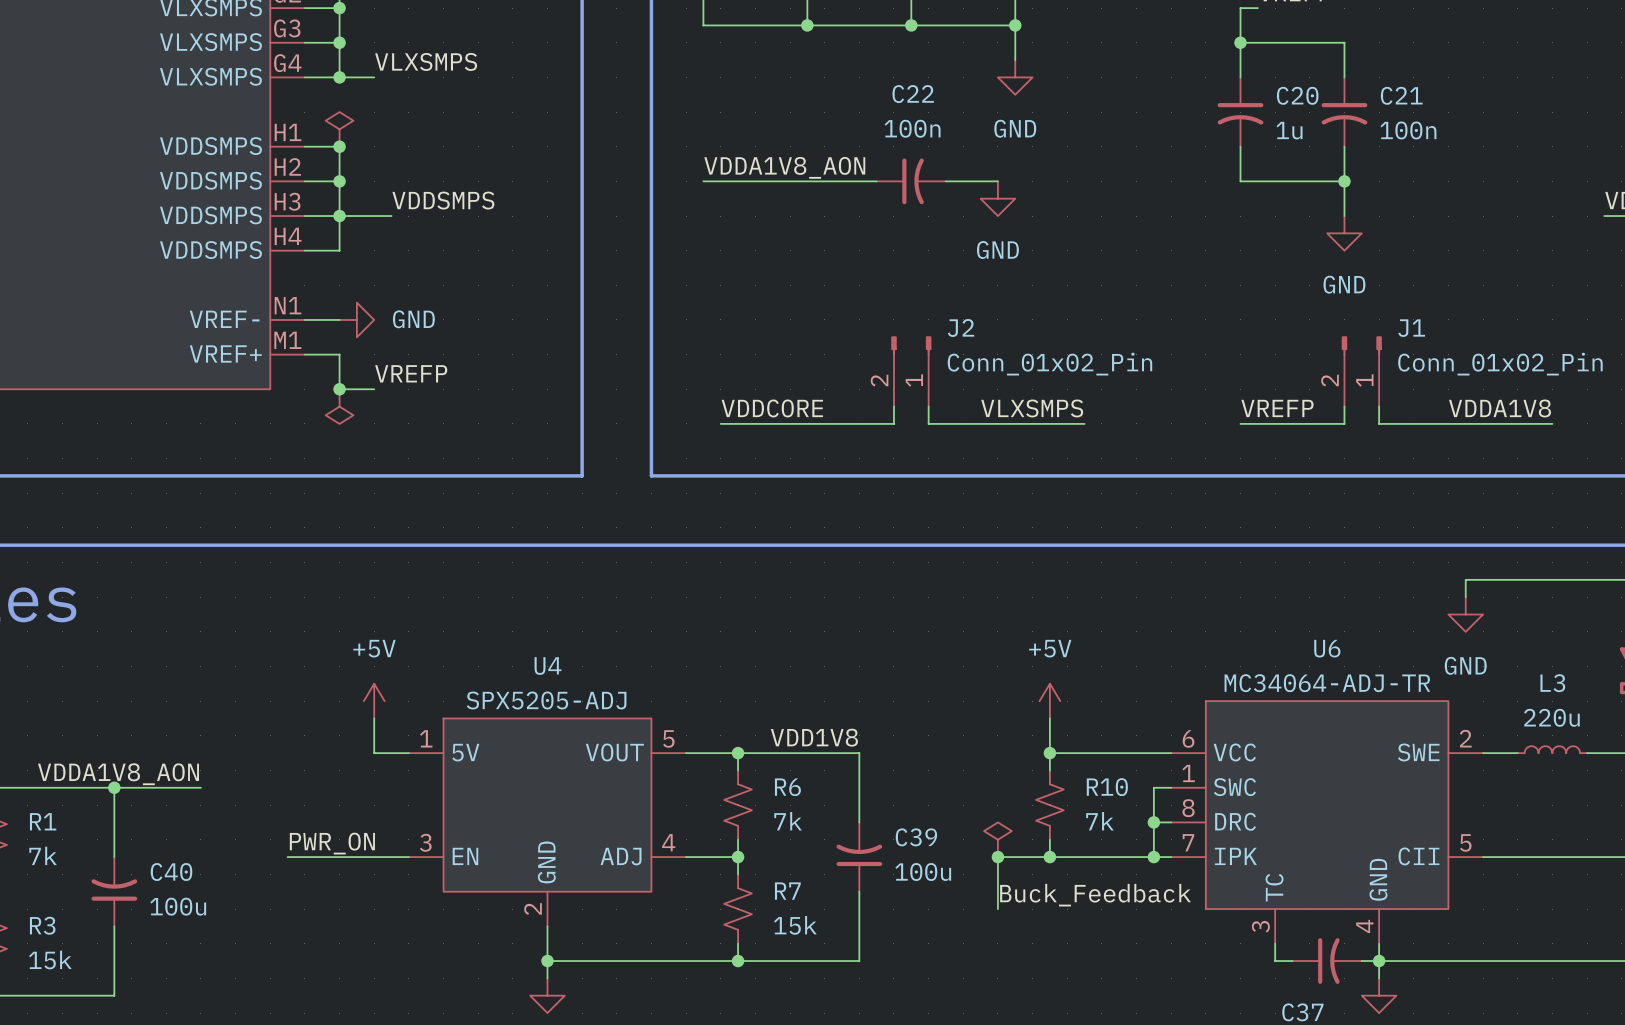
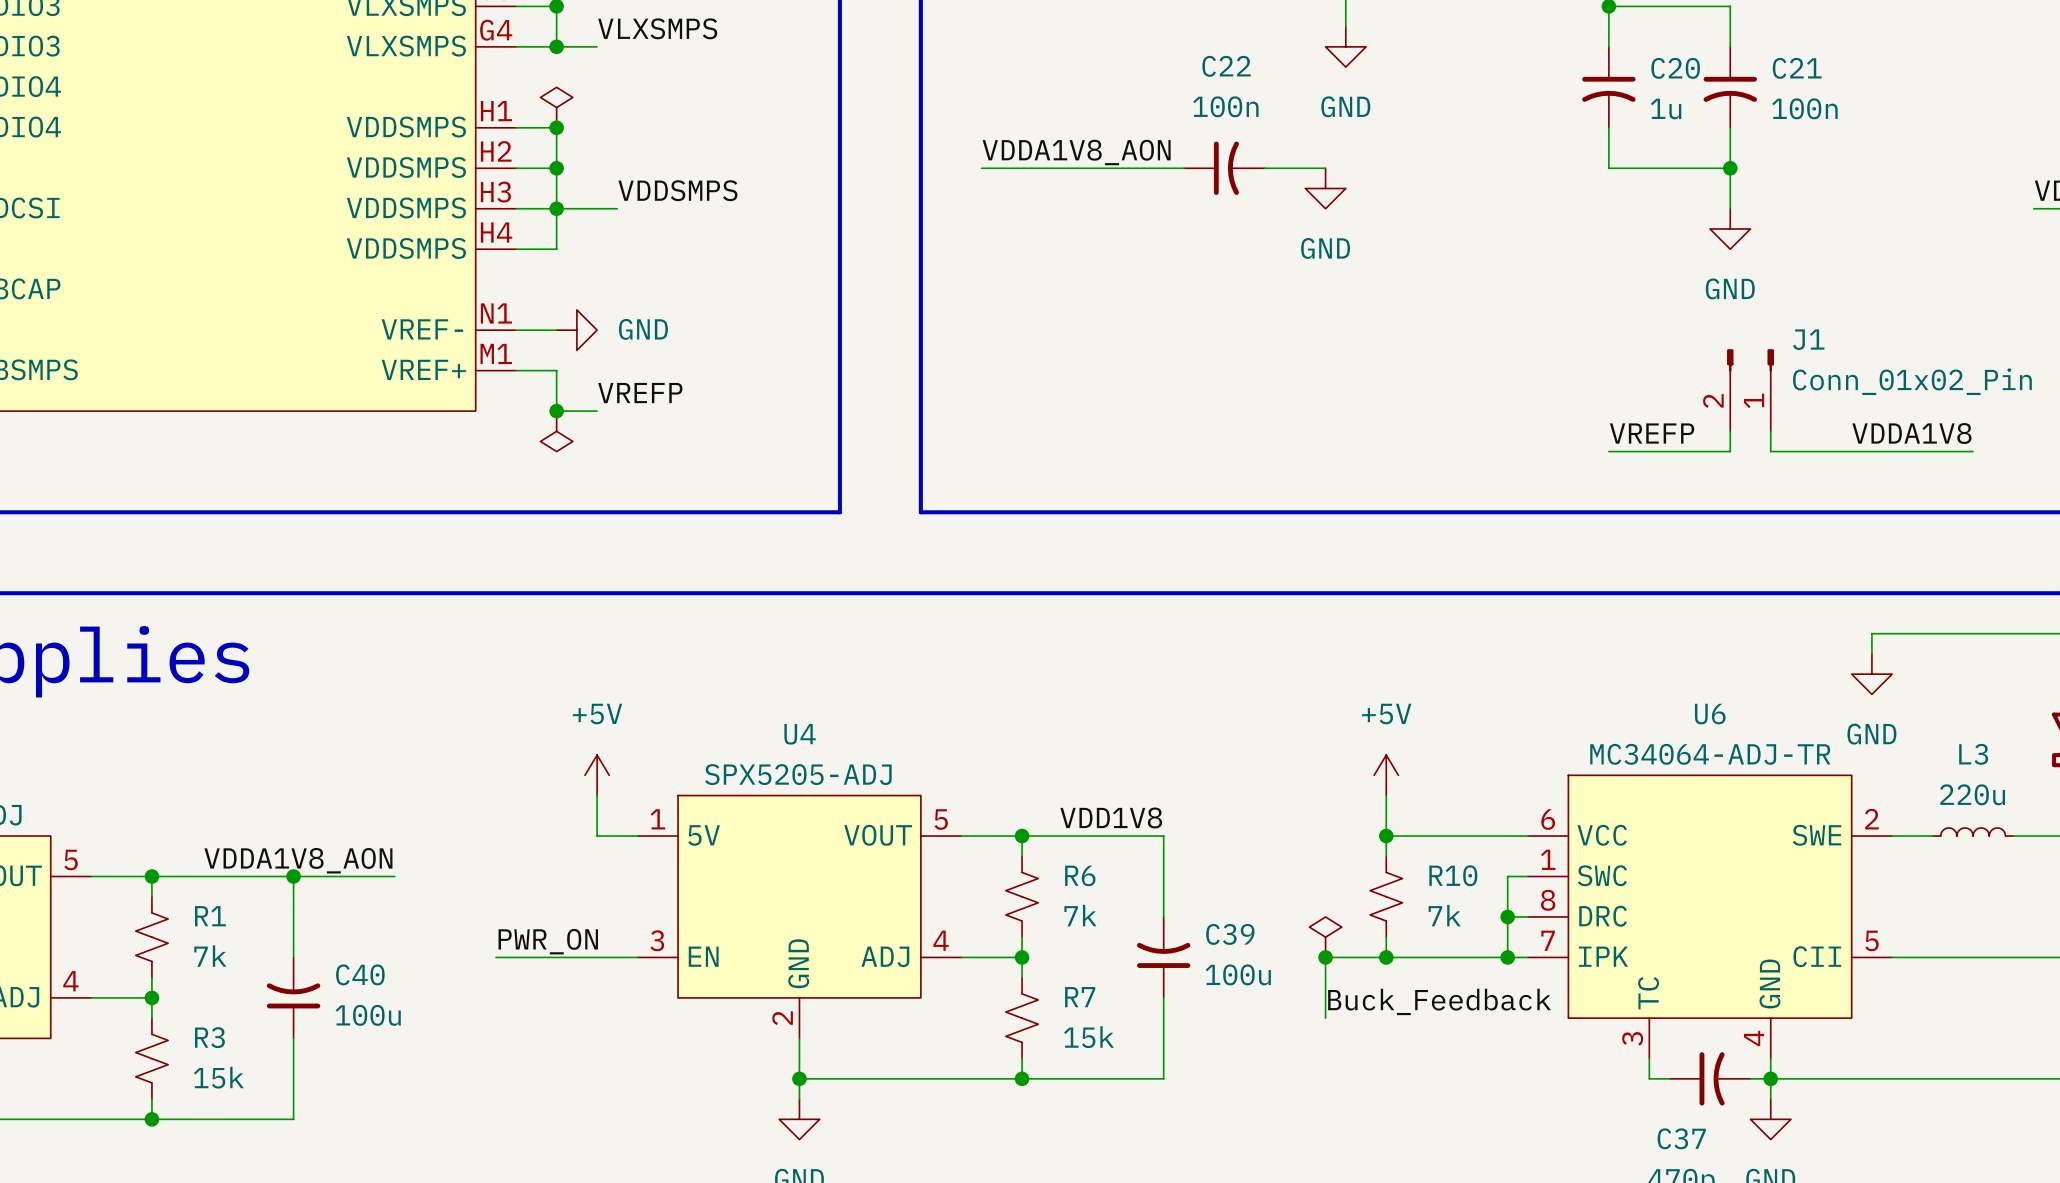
J2: Conn_01x02_Pin (911, 371) -> none
wire: (893, 406) (893, 423) (720, 423) -> none
wire: (928, 406) (928, 423) (1084, 423) -> none
label: VDDCORE (772, 408) -> none
label: VLXSMPS (1032, 408) -> none

